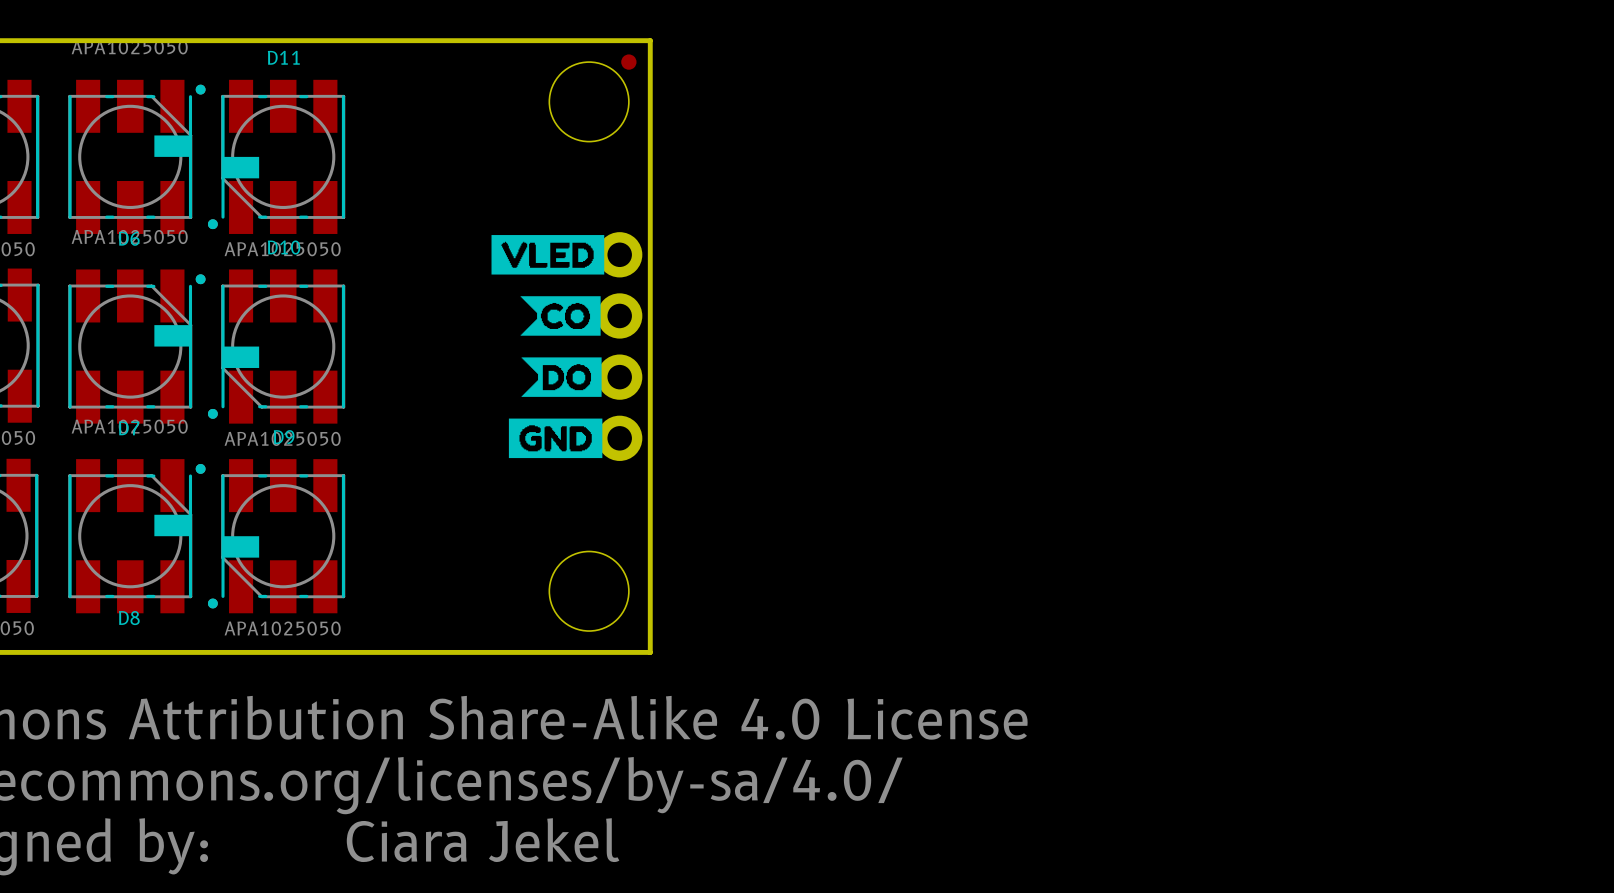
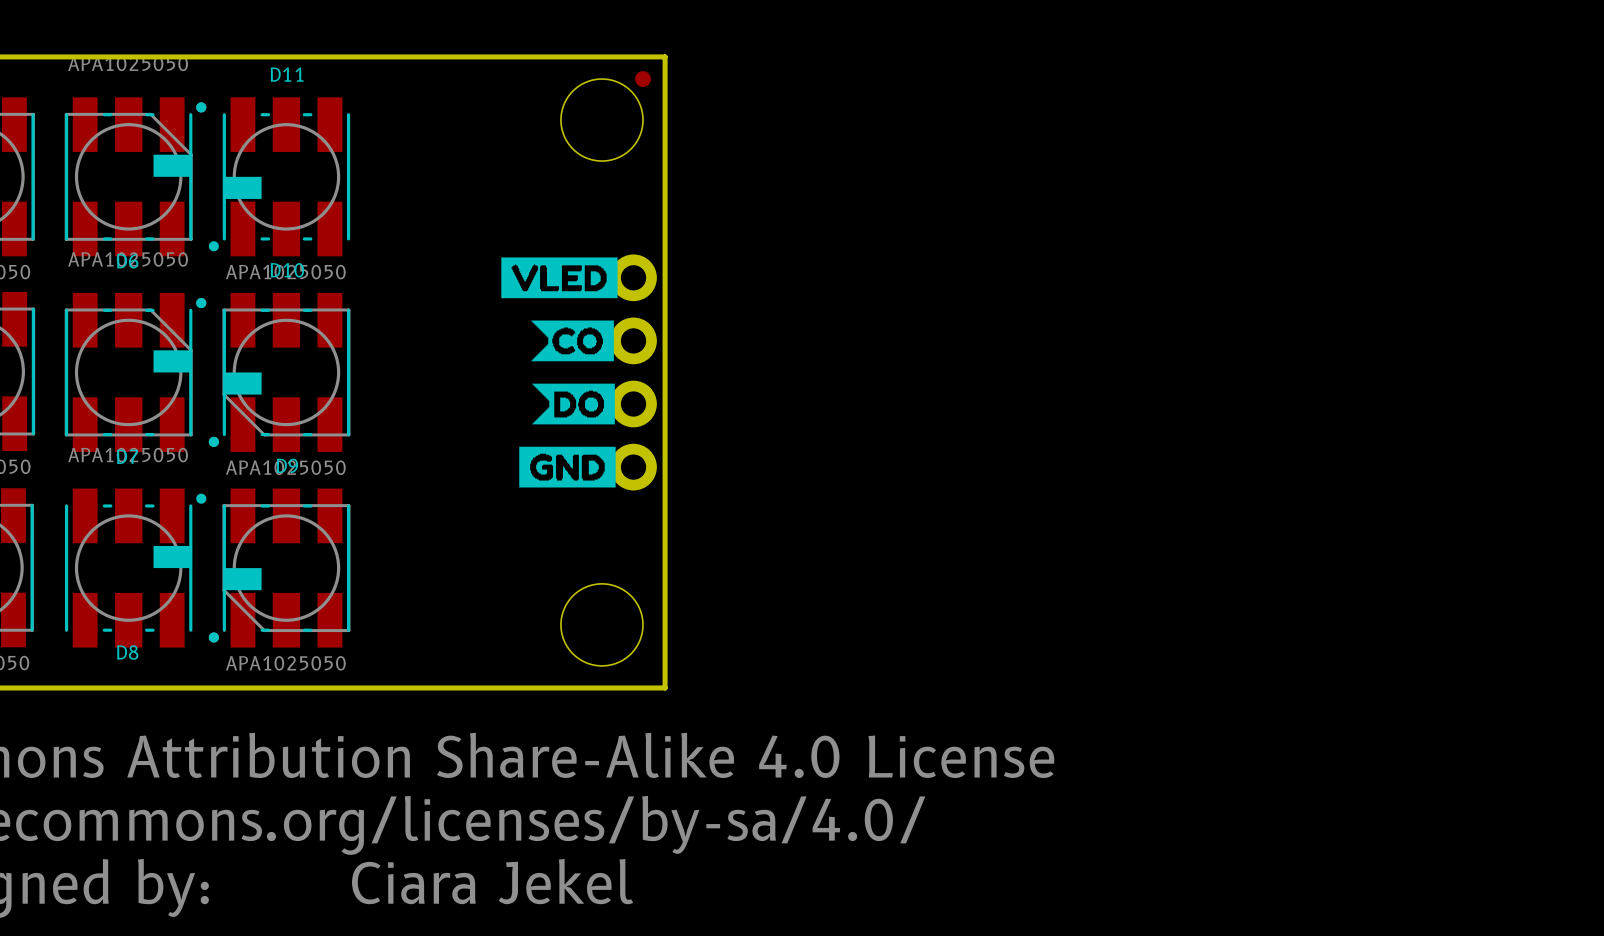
D11 footprint: [207, 79, 346, 234] -> [208, 97, 351, 257]
D8 footprint: [68, 459, 206, 614] -> [64, 488, 207, 648]

